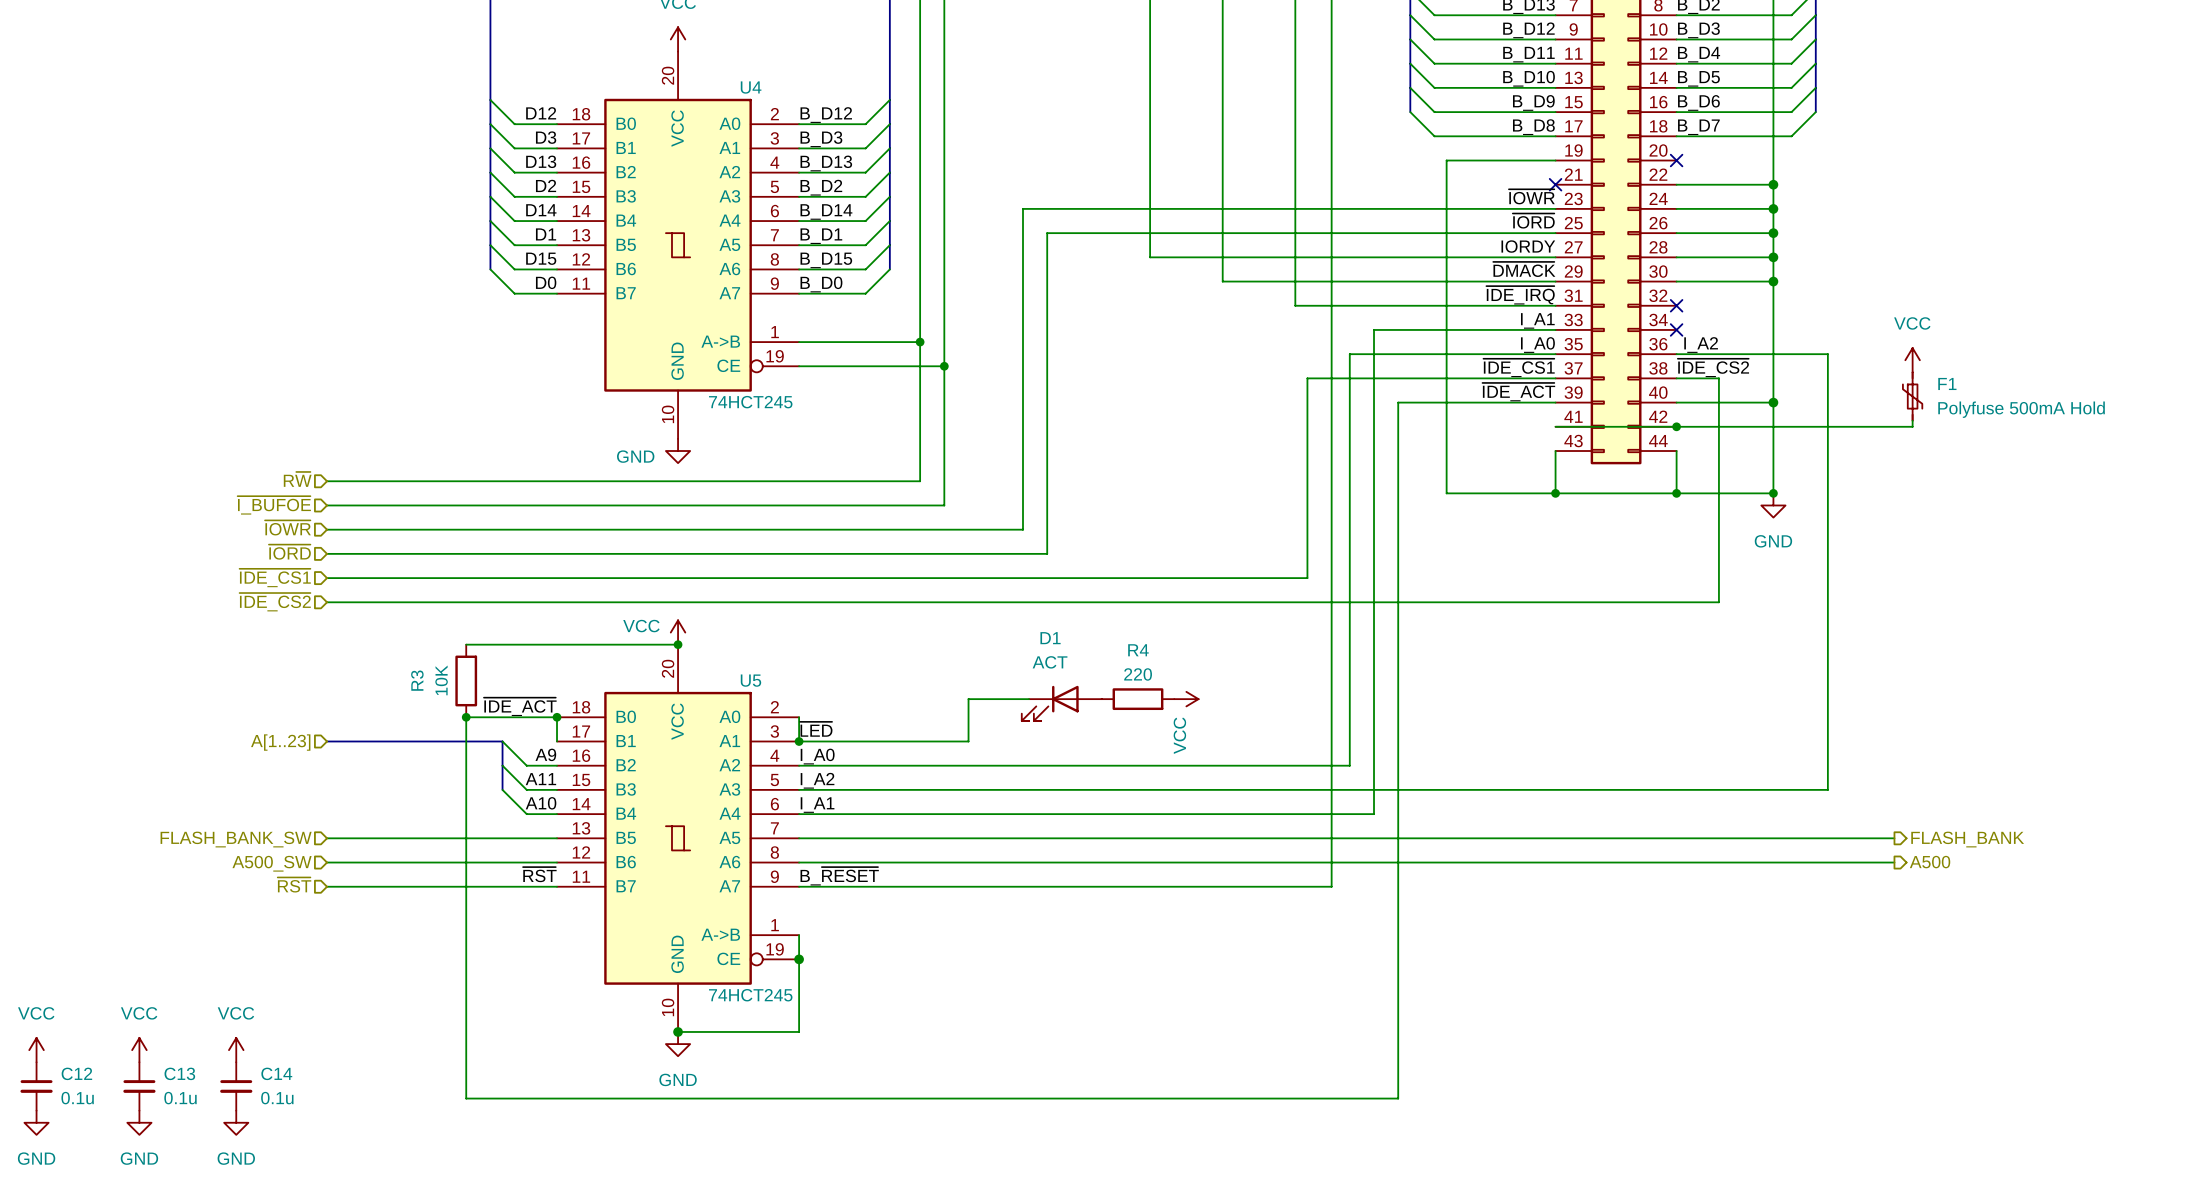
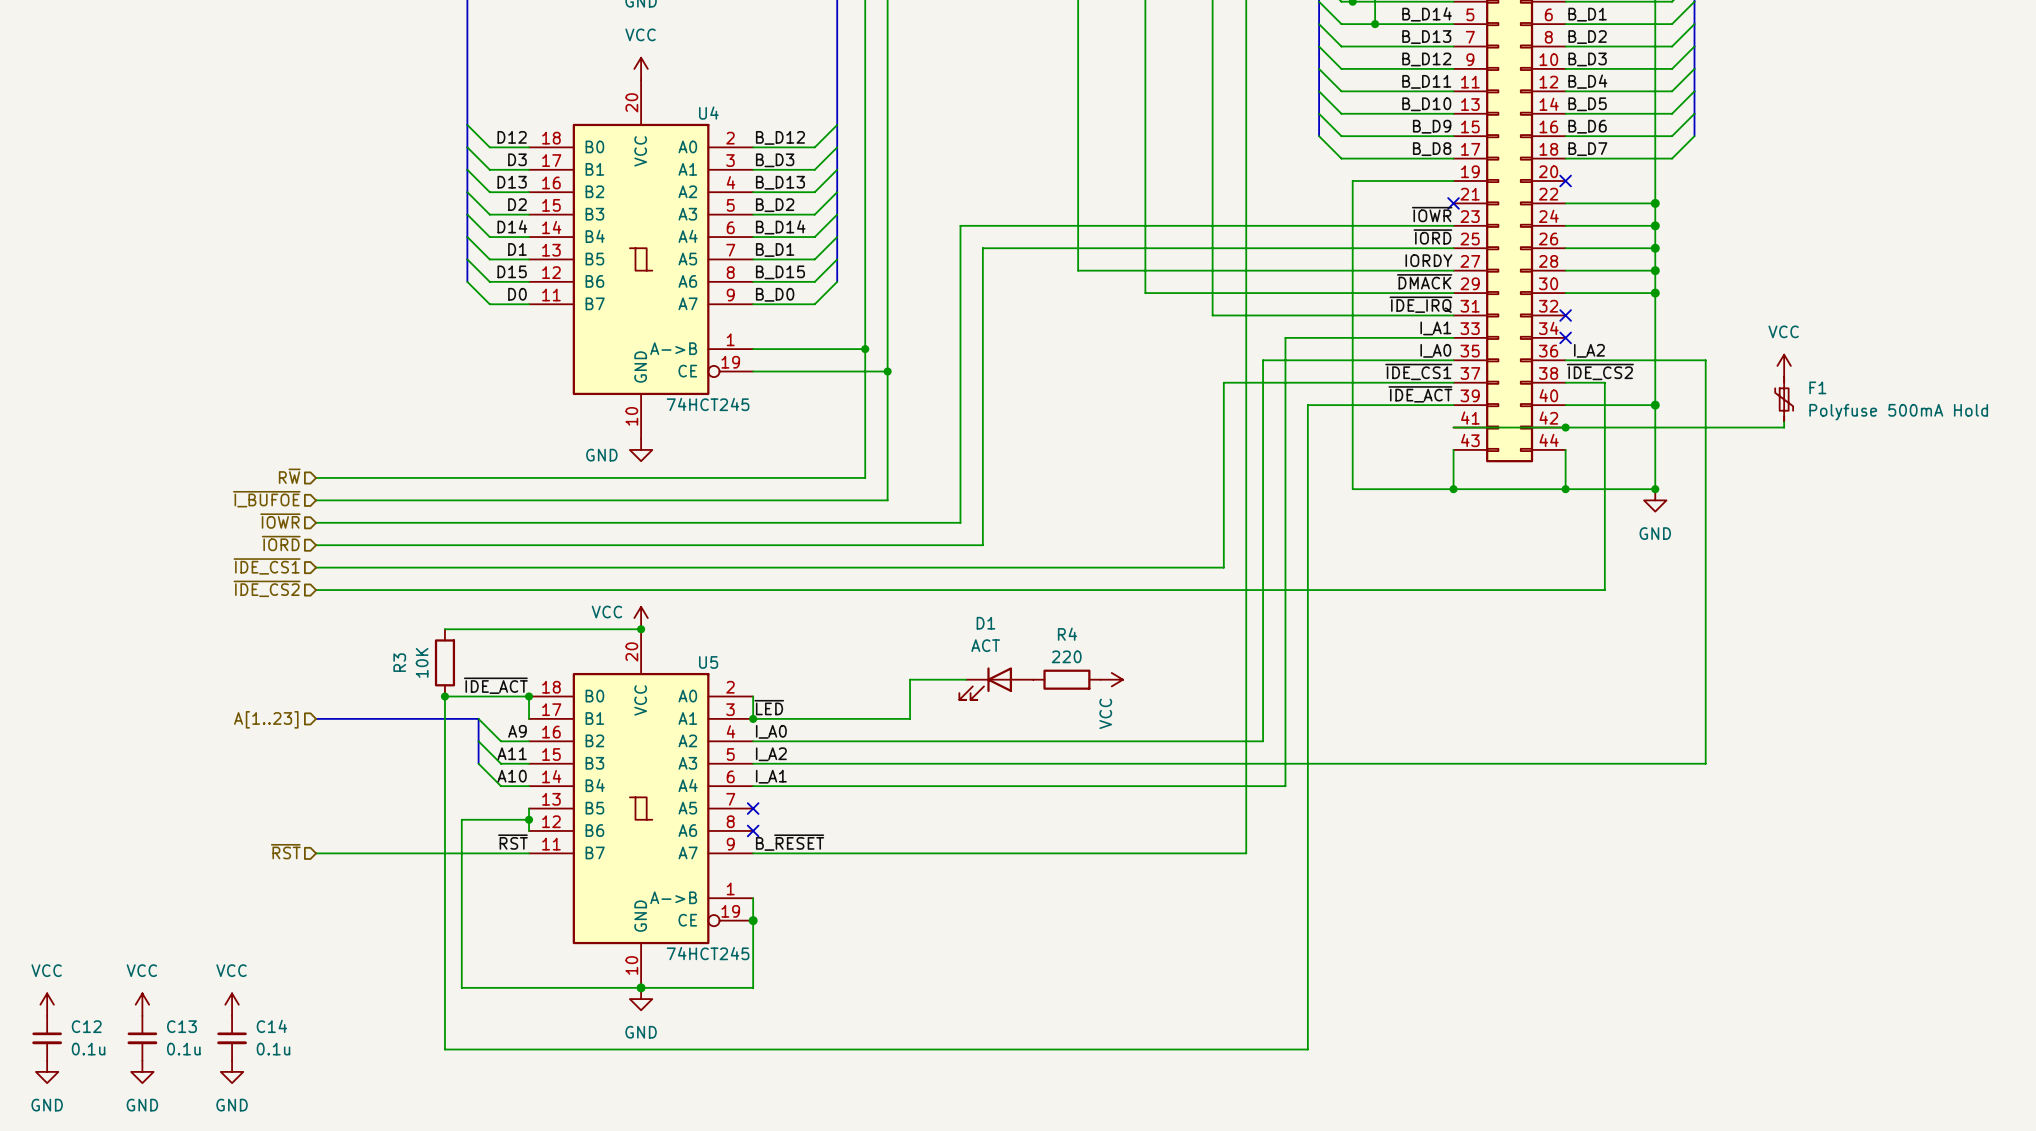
wire: (327, 838) (557, 838) -> (529, 830) (529, 808)
wire: (799, 838) (1894, 838) -> none
no-connect mark: none -> (753, 808)
hierarchical label: FLASH_BANK_SW (236, 839) -> none
hierarchical label: FLASH_BANK (1967, 839) -> none
wire: none -> (529, 819) (461, 819) (461, 987) (641, 987)
junction: none -> (529, 819)
wire: (327, 862) (557, 862) -> none
wire: (799, 862) (1894, 862) -> none
no-connect mark: none -> (753, 830)
hierarchical label: A500 (1930, 862) -> none
hierarchical label: A500_SW (272, 863) -> none

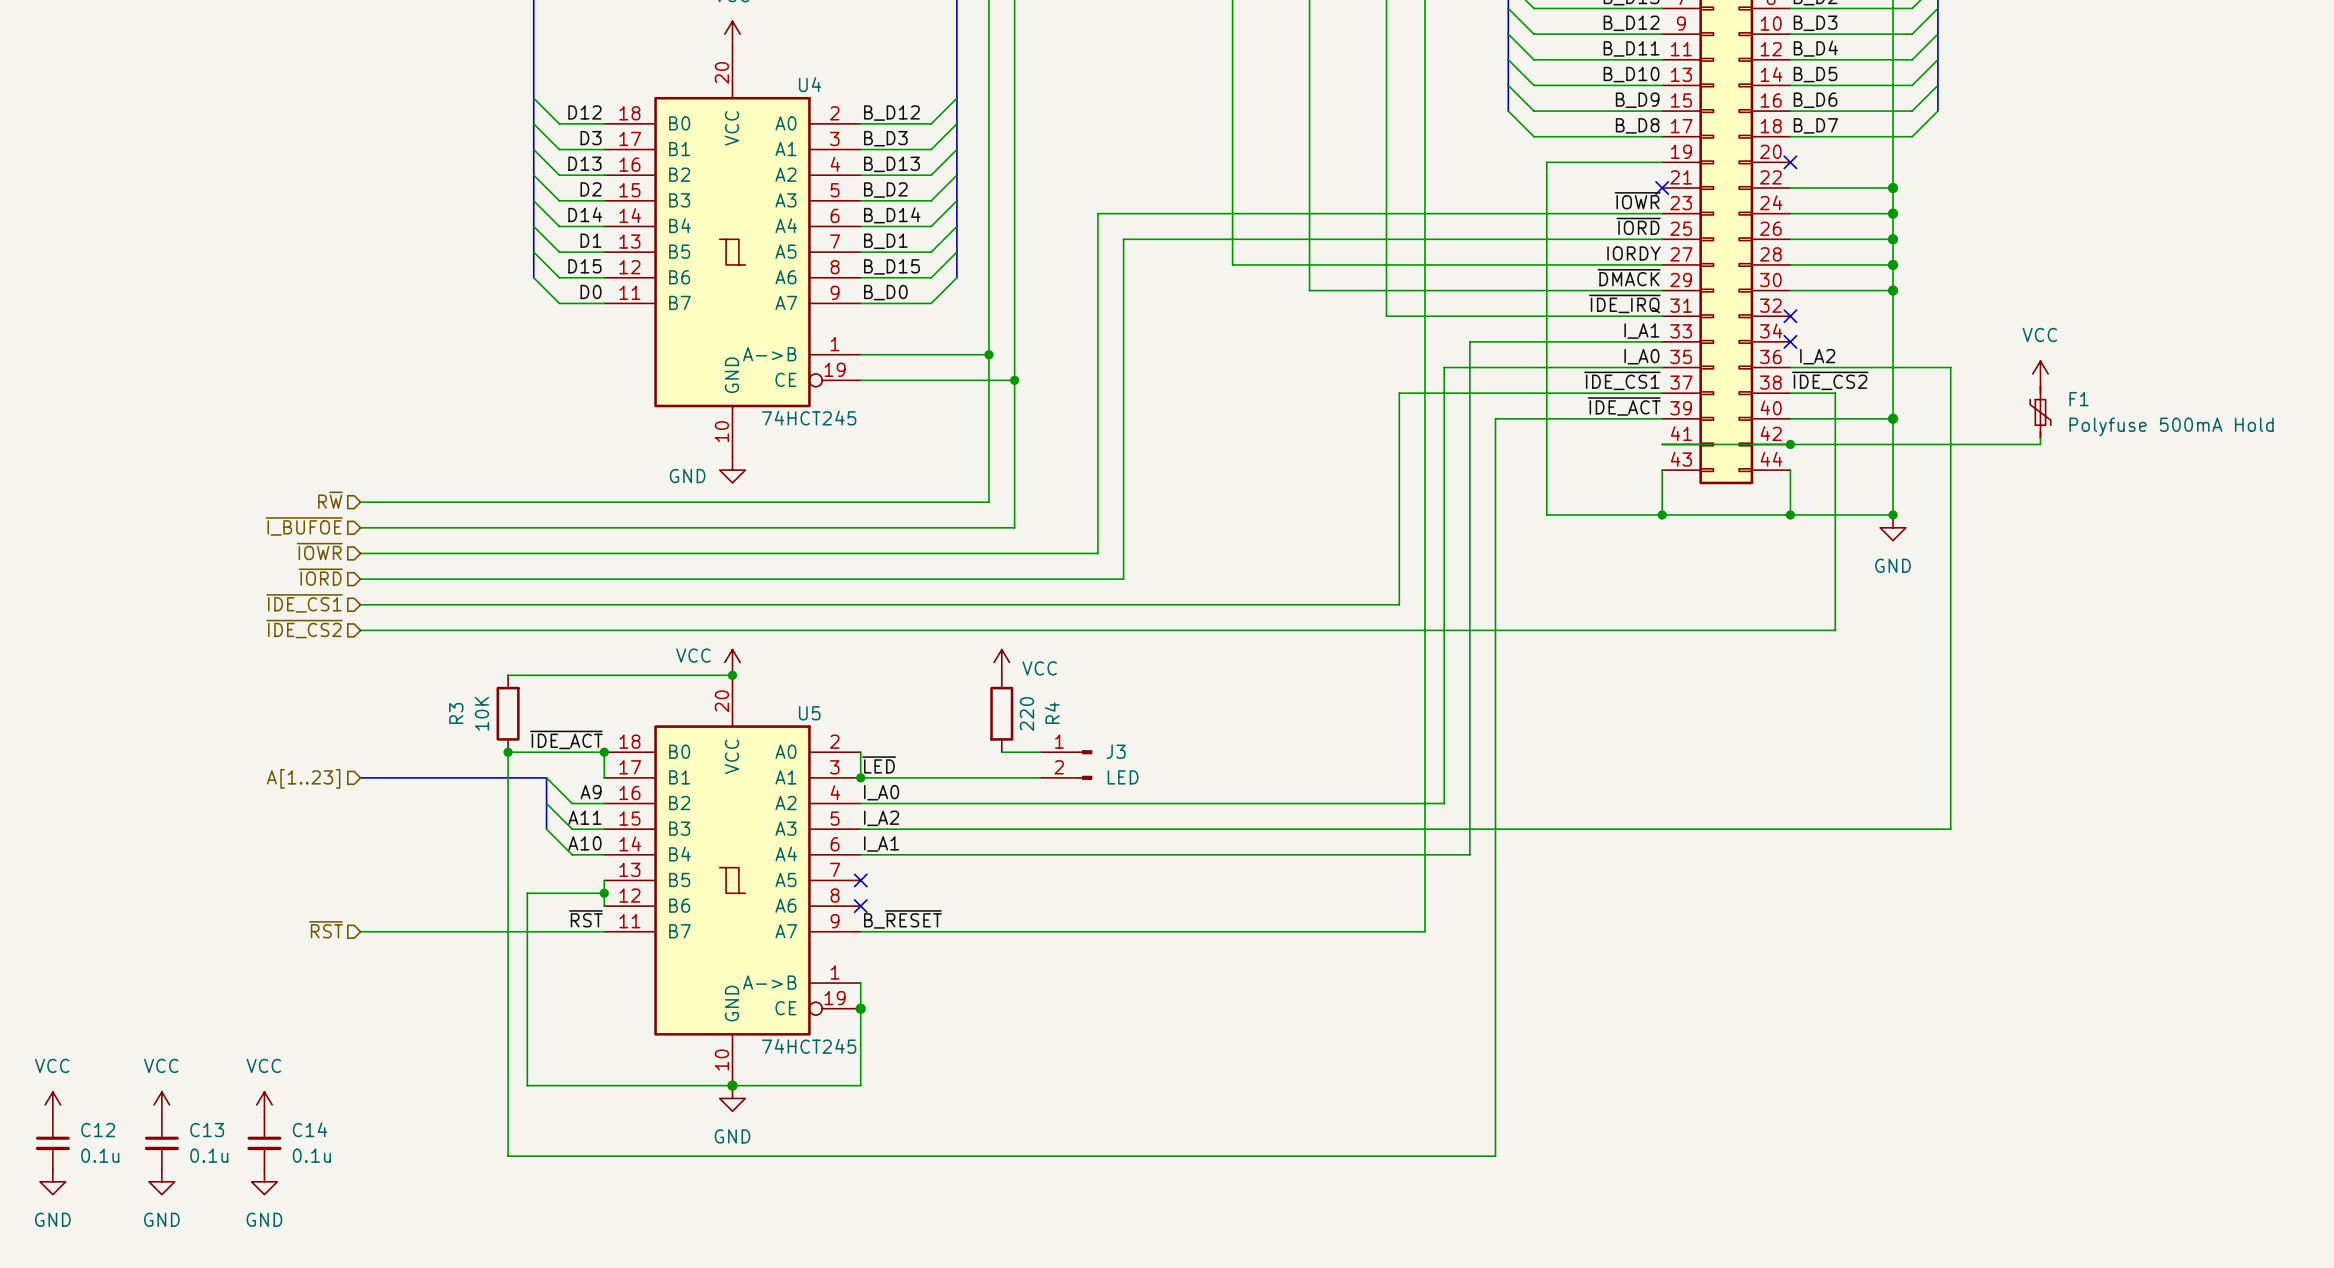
power symbol: none -> VCC (1001, 662)
wire: (966, 679) (910, 679) (910, 718) -> none
R4 rotation: 0° (1066, 679) -> 90° clockwise (1001, 713)
R4 position: (1066, 679) -> (1001, 713)
power symbol: VCC (1111, 679) -> none
D1: ACT (996, 683) -> none
wire: none -> (1001, 752) (1040, 752)
J3: none -> LED (1066, 765)

